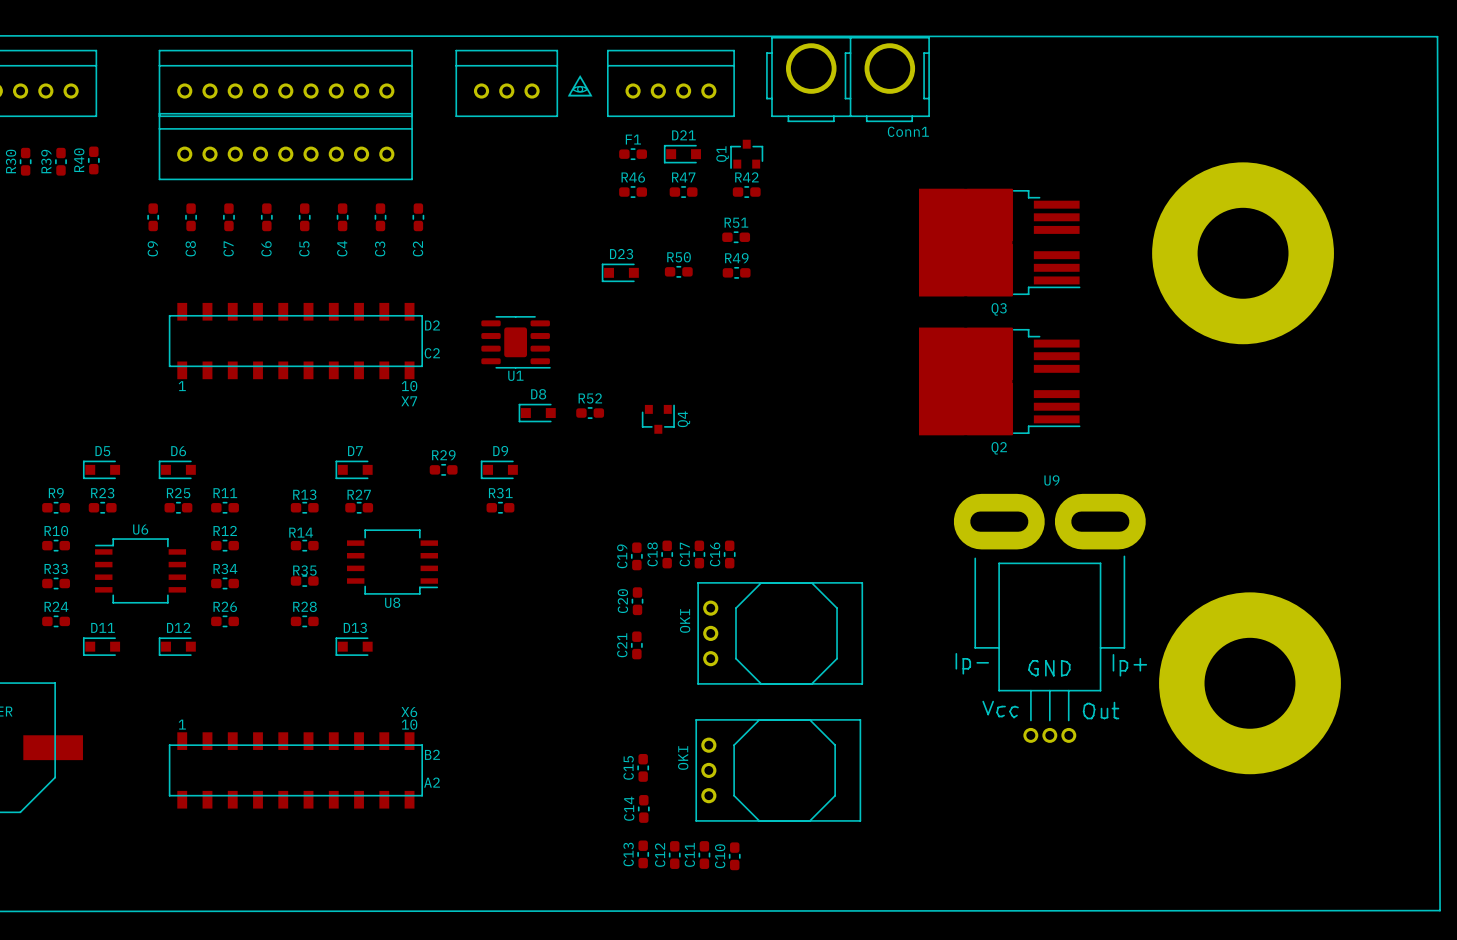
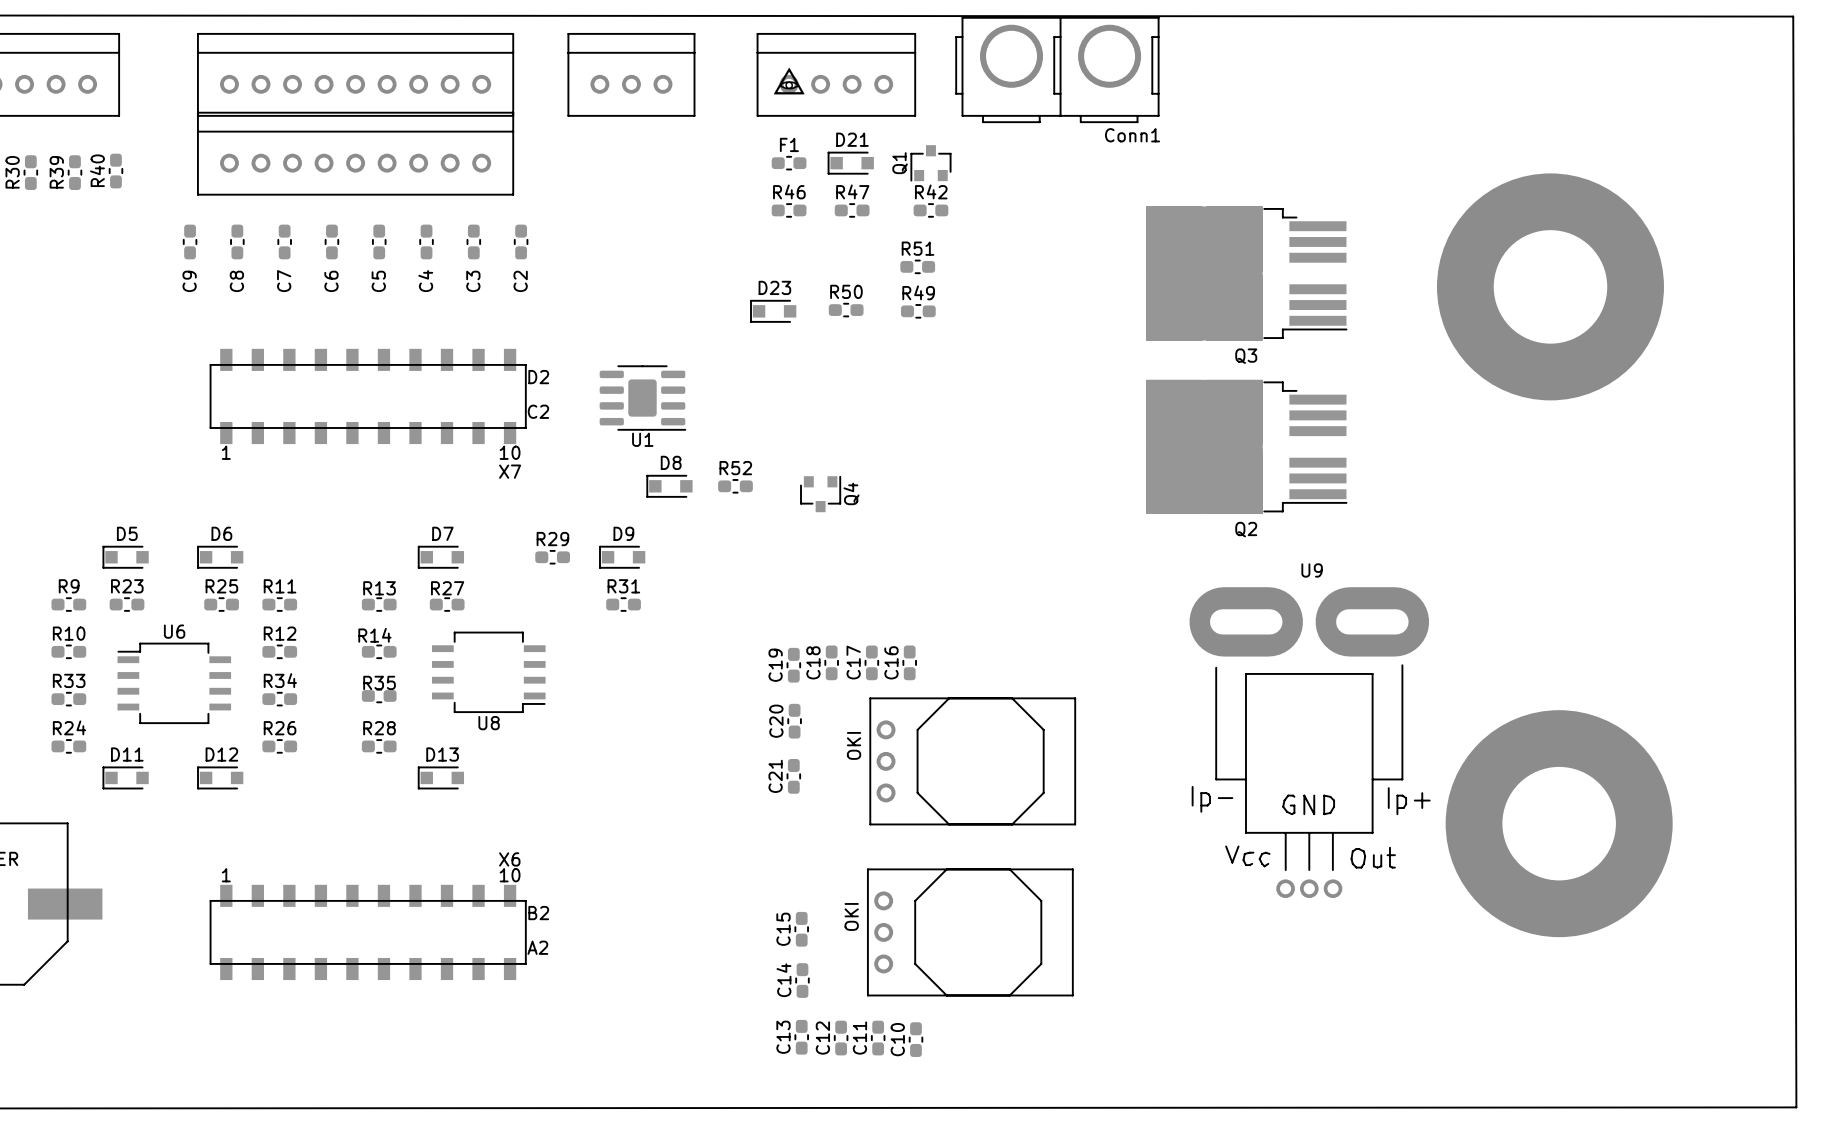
drawing position: (580, 85) -> (789, 81)

